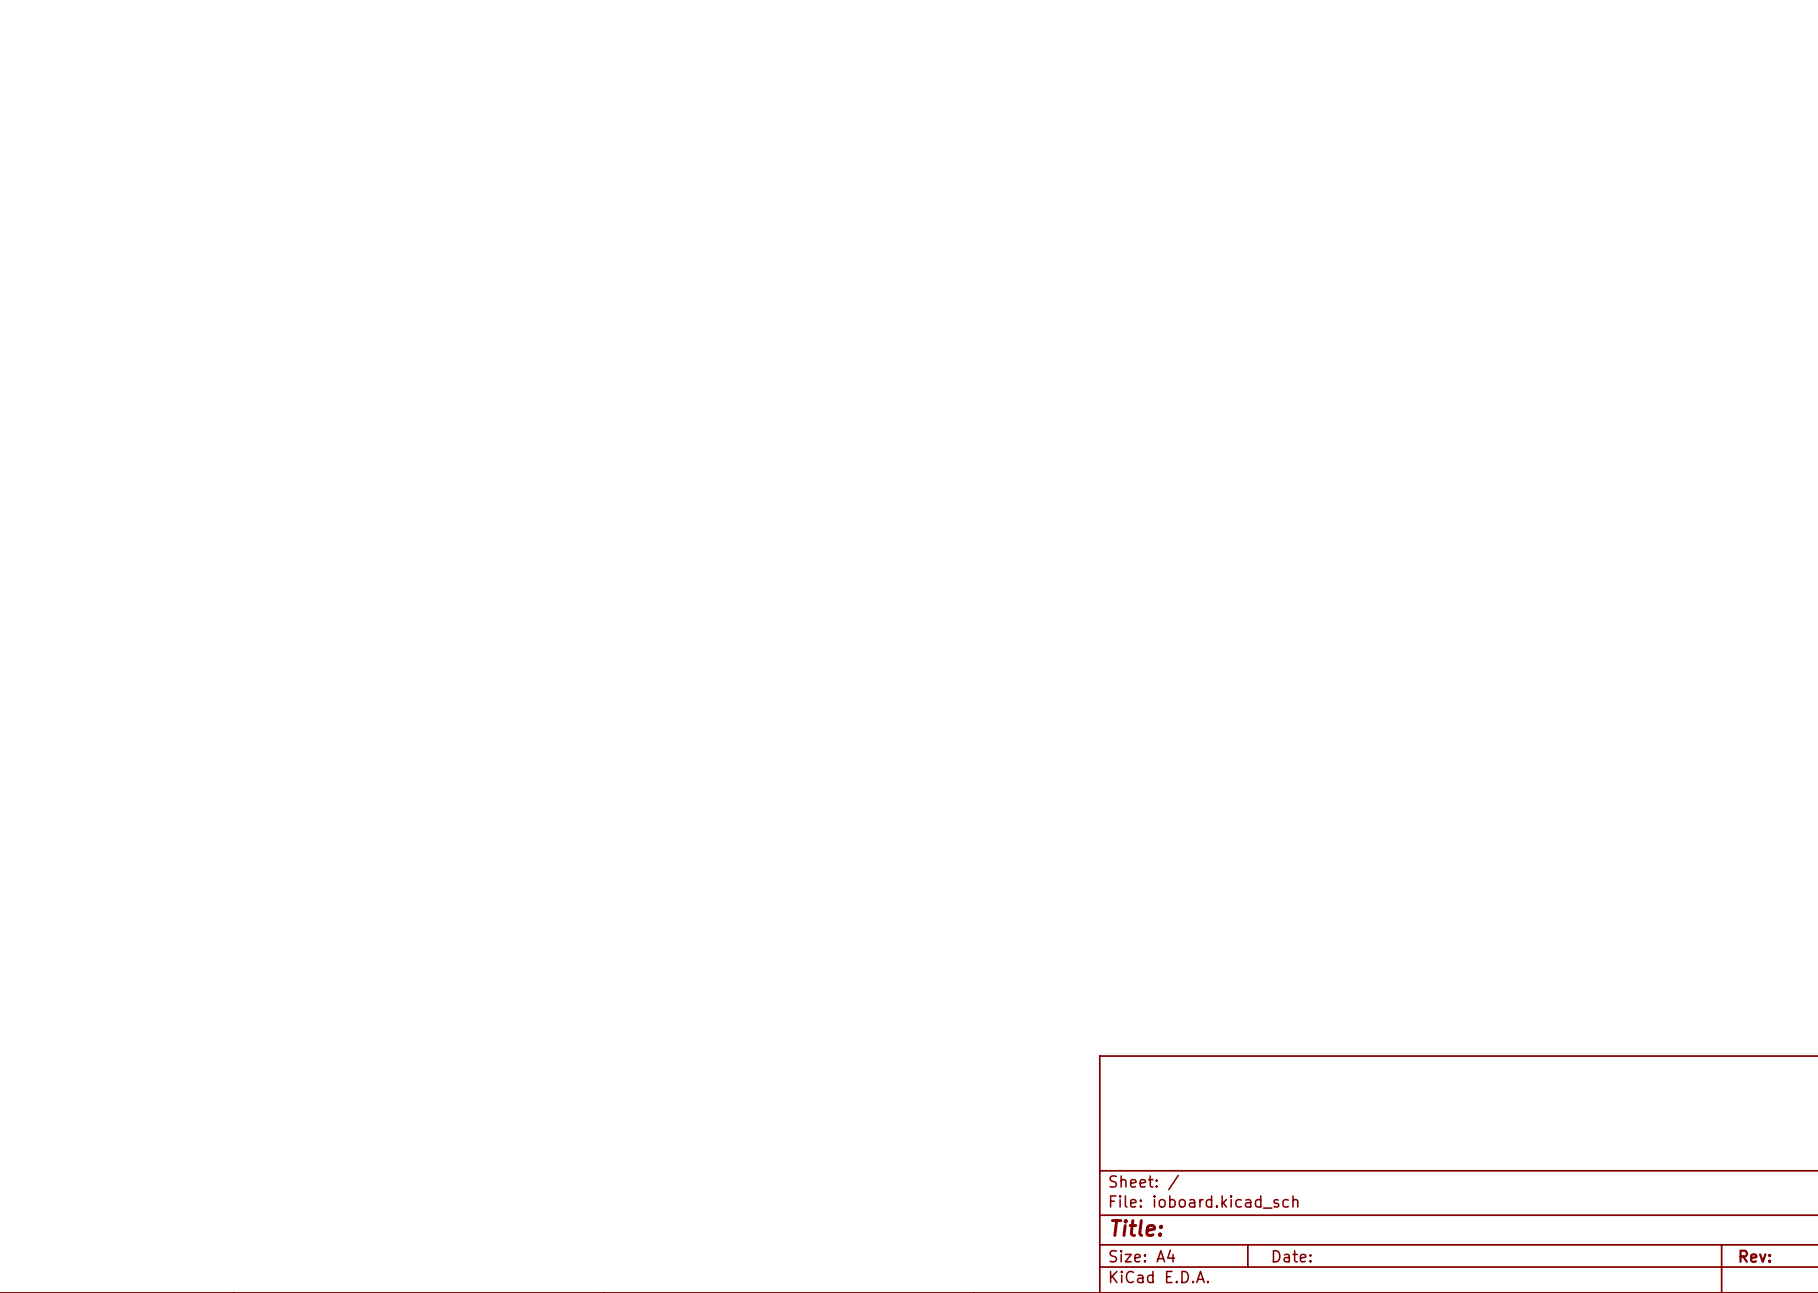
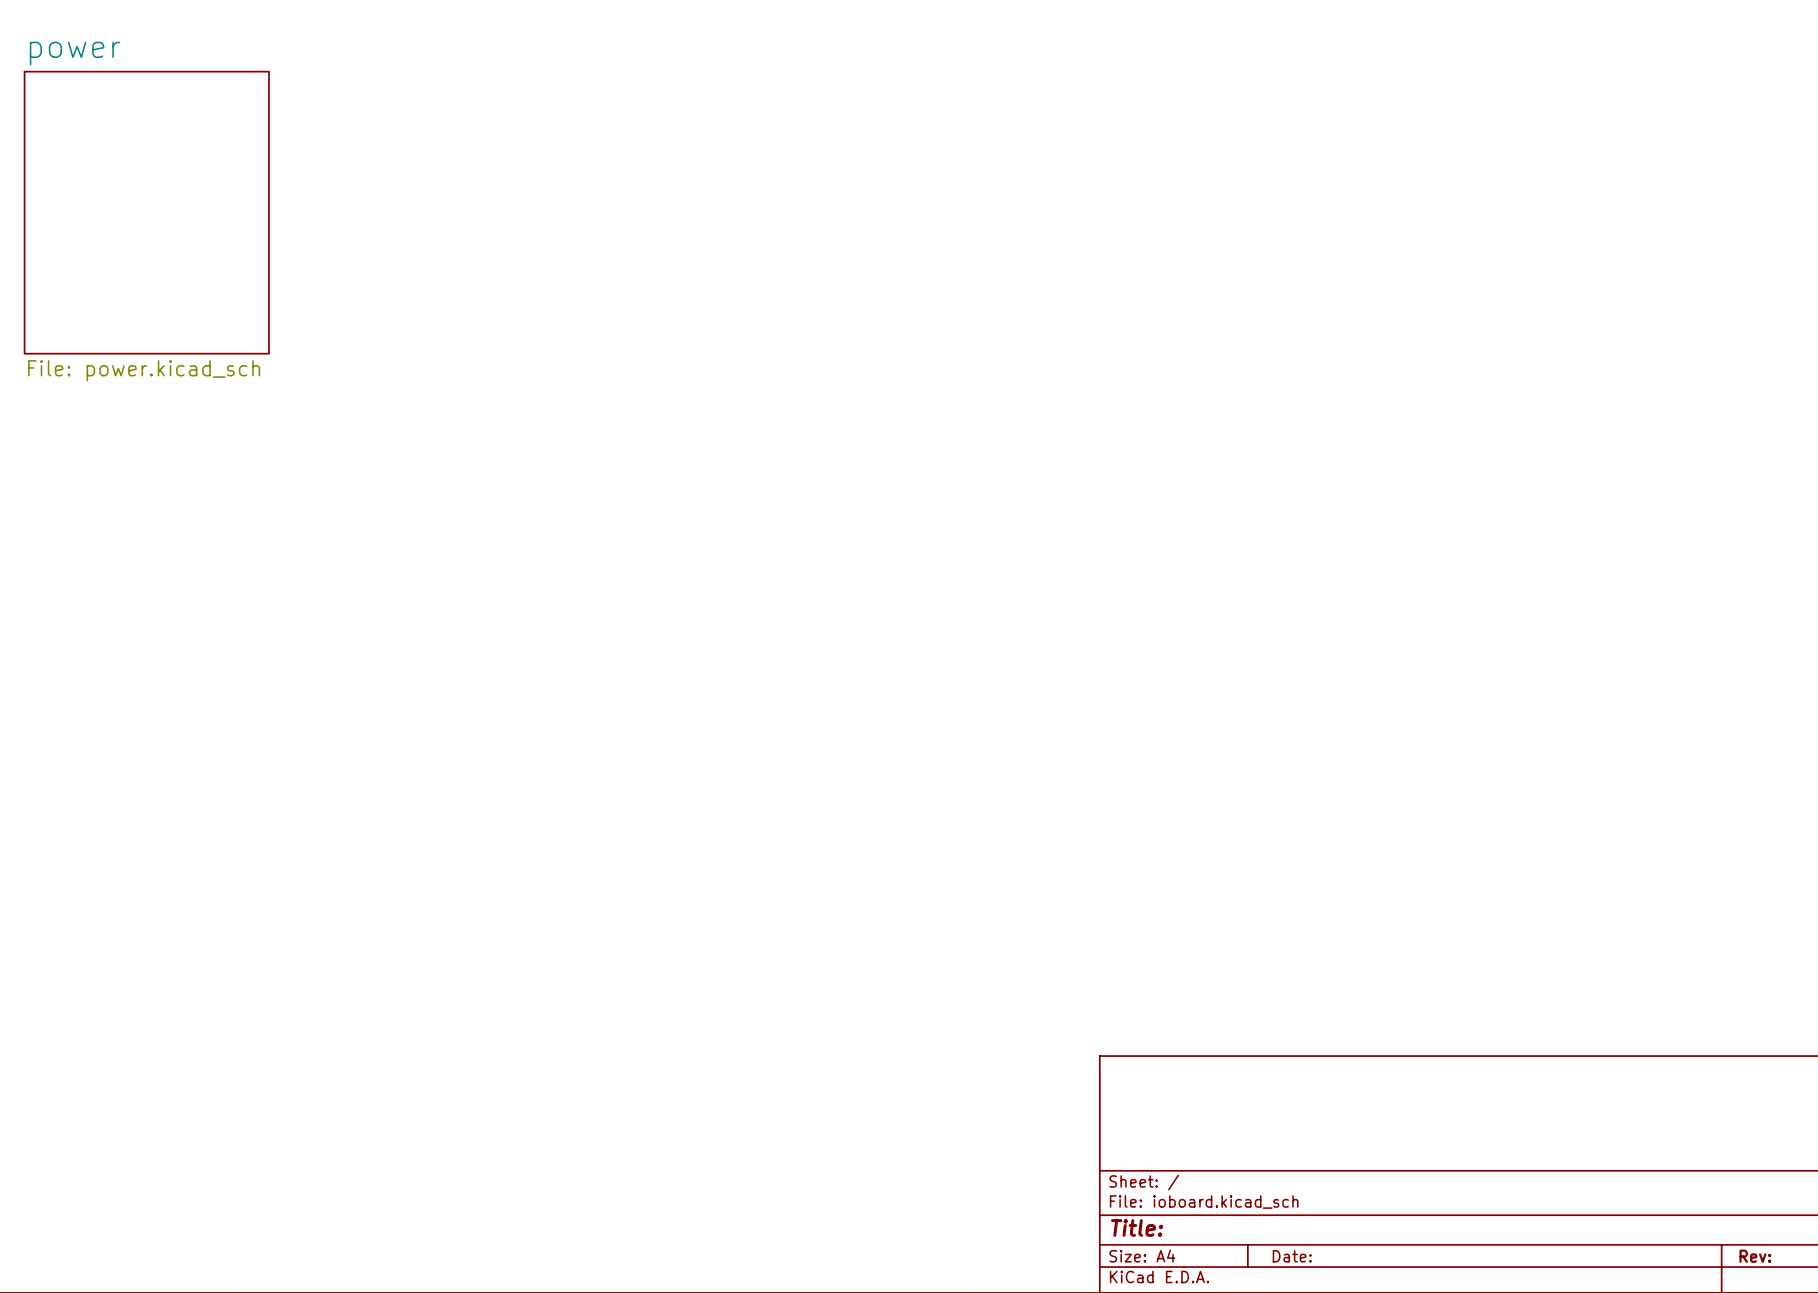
sheet power: none -> File: power.kicad_sch (146, 212)

